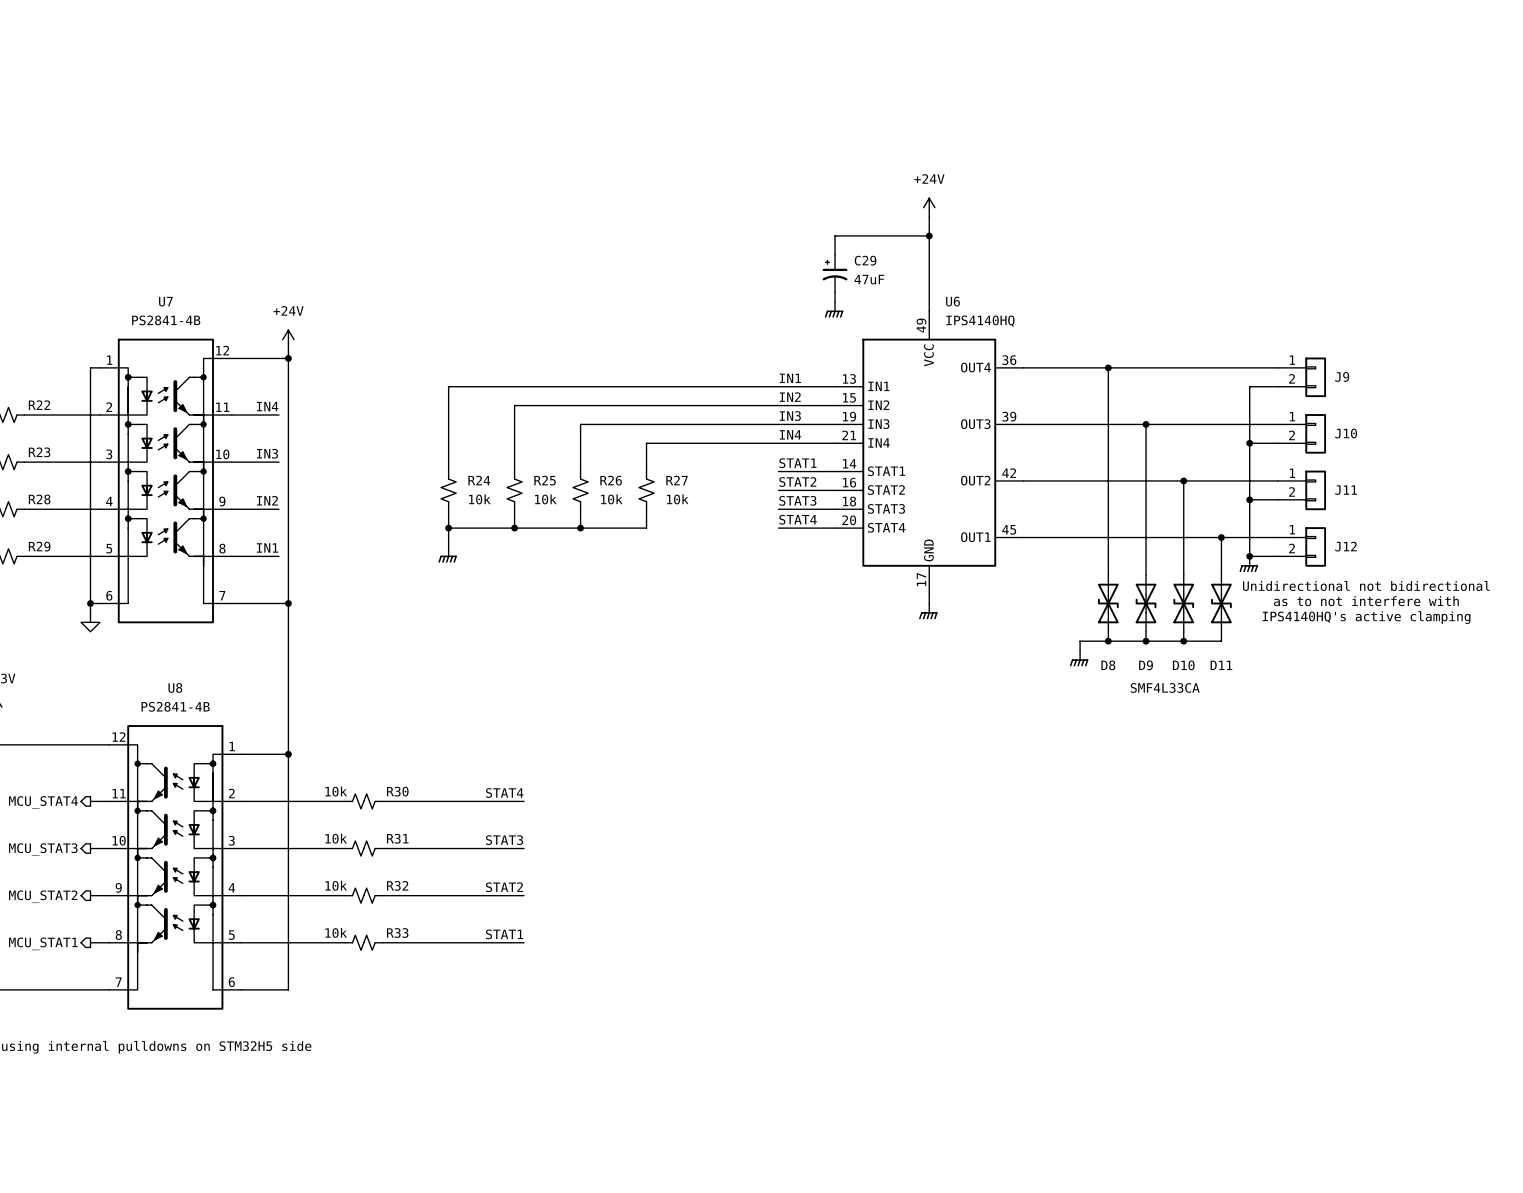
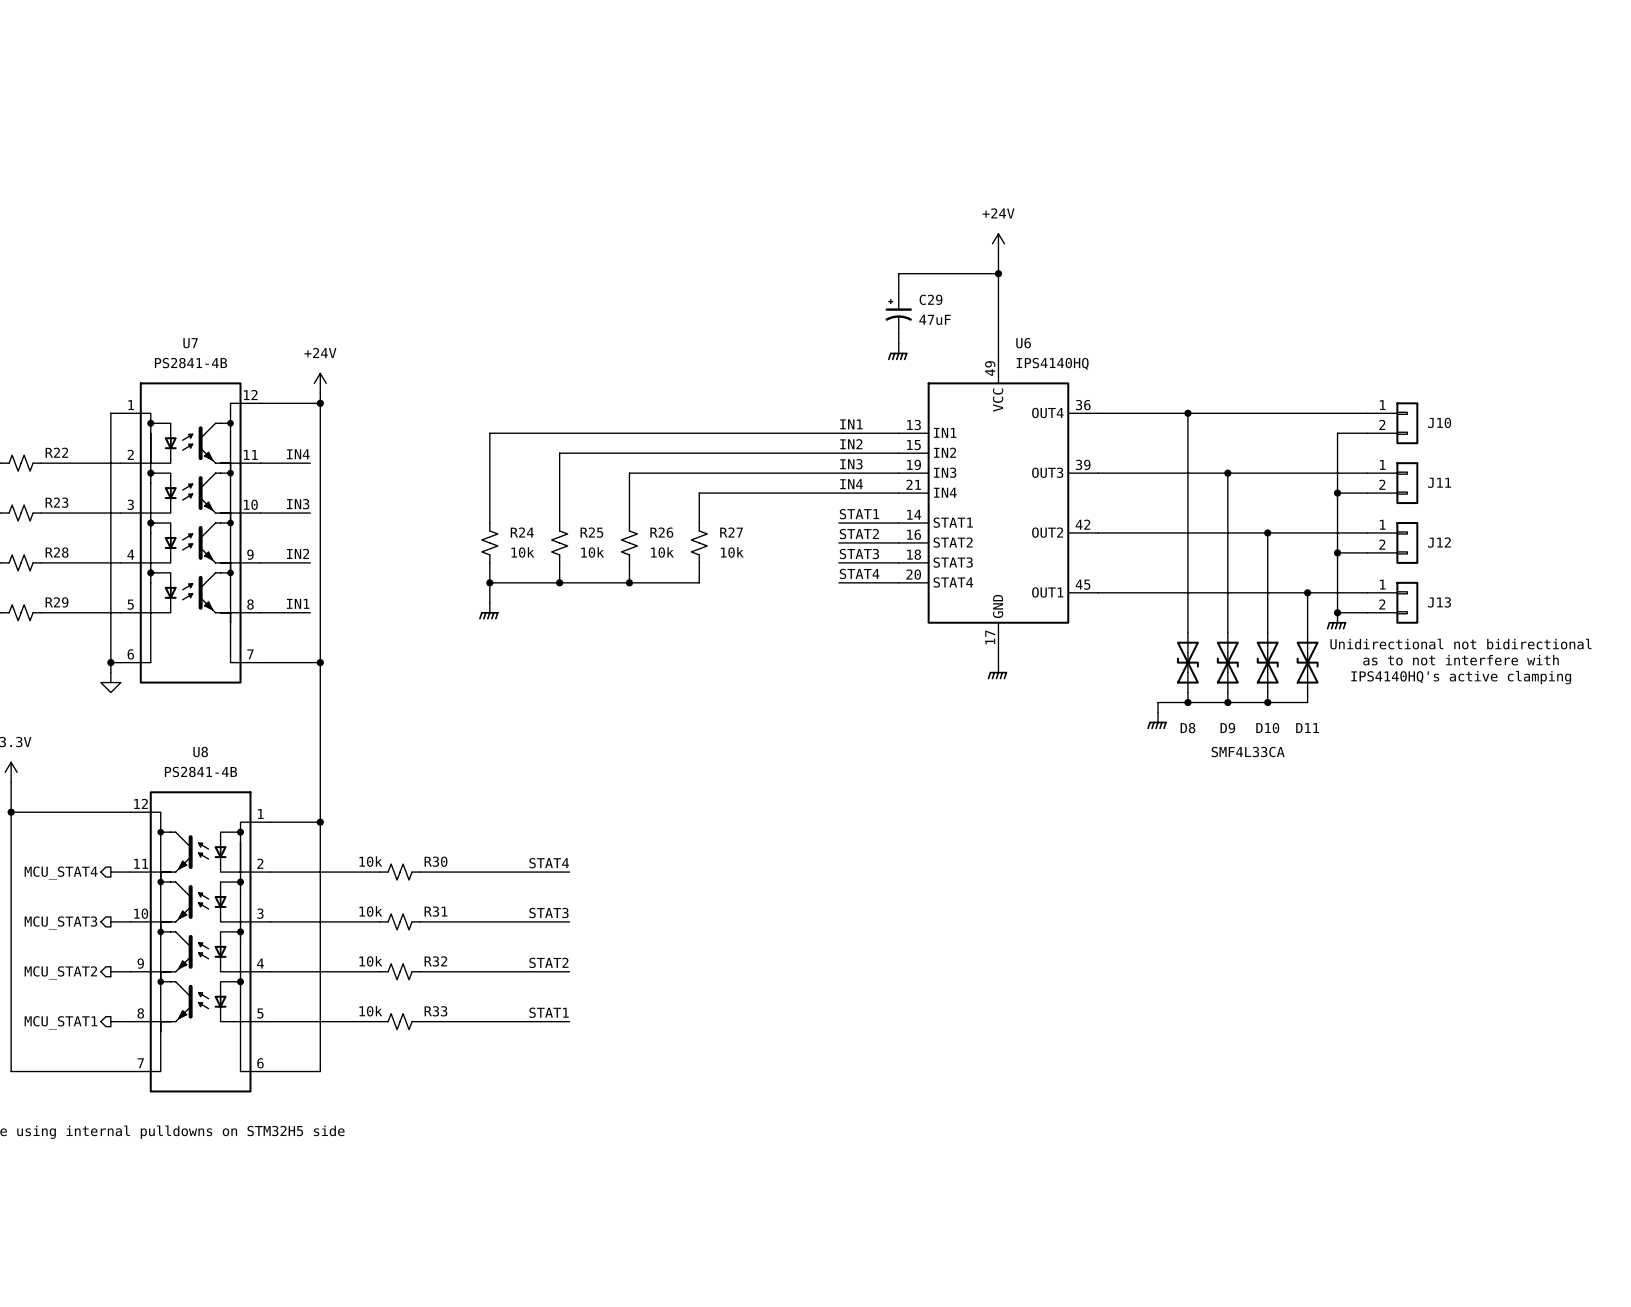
J9 name: J9 (1342, 376) -> J10 (1439, 422)
J10 name: J10 (1346, 433) -> J11 (1439, 482)
J11 name: J11 (1346, 490) -> J12 (1439, 542)
J12 name: J12 (1345, 546) -> J13 (1439, 602)

